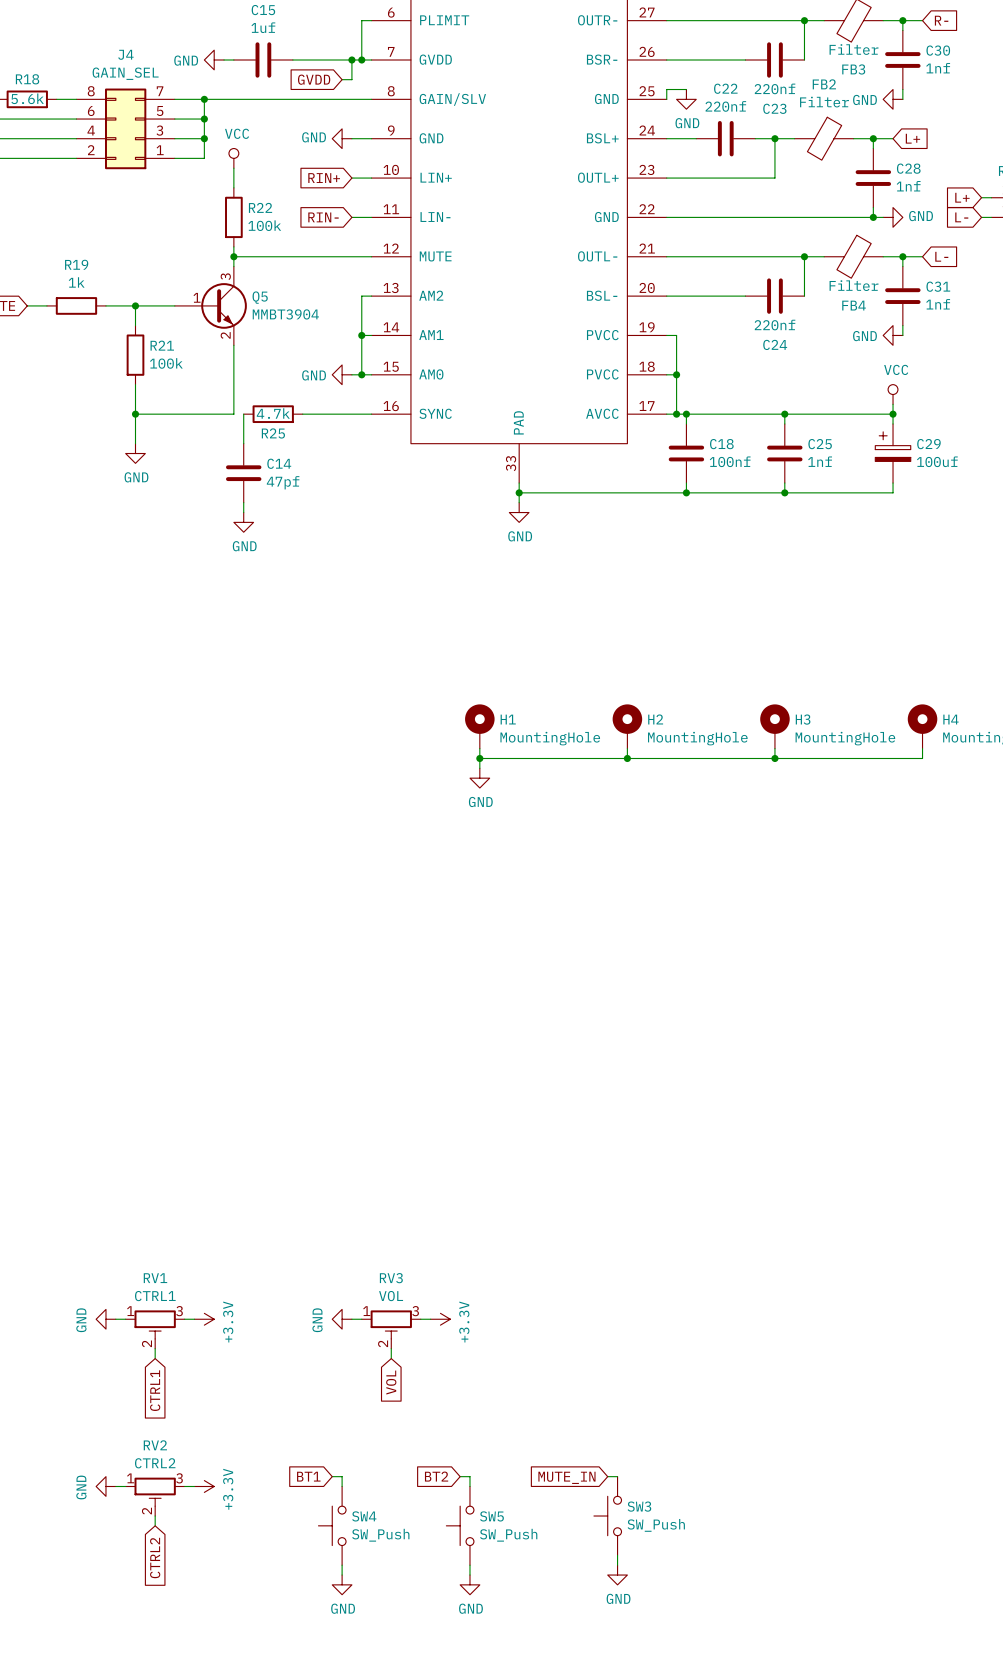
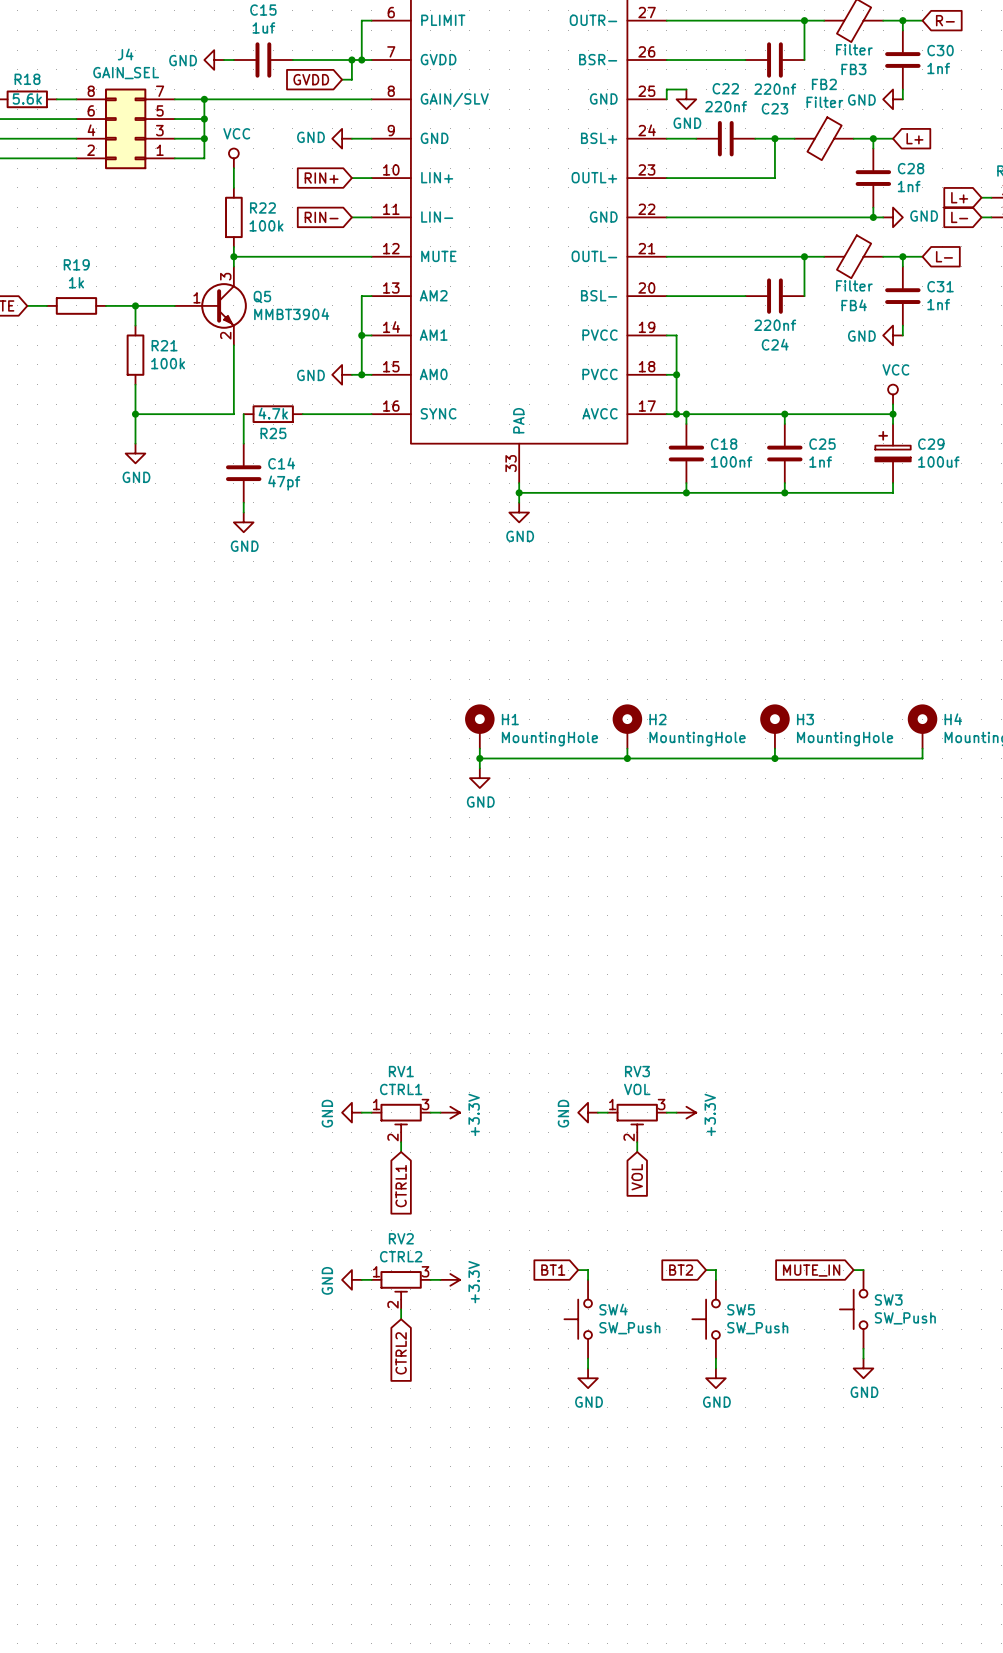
power symbol: none -> GND (351, 1112)
wire: none -> (361, 1112) (371, 1112)
wire: none -> (430, 1112) (440, 1112)
power symbol: none -> +3.3V (450, 1112)
power symbol: none -> GND (588, 1112)
wire: none -> (597, 1112) (607, 1112)
wire: none -> (666, 1112) (676, 1112)
power symbol: none -> +3.3V (686, 1112)
wire: none -> (401, 1142) (401, 1152)
wire: none -> (637, 1142) (637, 1152)
global label: none -> VOL (637, 1177)
global label: none -> CTRL1 (401, 1186)
global label: none -> BT2 (681, 1270)
global label: none -> BT1 (553, 1270)
wire: none -> (578, 1270) (588, 1270) (588, 1279)
wire: none -> (706, 1270) (715, 1270) (715, 1279)
wire: none -> (853, 1270) (863, 1270)
global label: none -> MUTE_IN (811, 1270)
power symbol: GND (105, 1319) -> none
wire: (115, 1319) (125, 1319) -> none
wire: (184, 1319) (194, 1319) -> none
power symbol: +3.3V (204, 1319) -> none
power symbol position: GND (342, 1319) -> GND (351, 1279)
wire: (351, 1319) (361, 1319) -> (361, 1279) (371, 1279)
wire: (420, 1319) (430, 1319) -> (430, 1279) (440, 1279)
power symbol position: +3.3V (440, 1319) -> +3.3V (450, 1279)
RV1 position: (155, 1329) -> (401, 1122)
RV3 position: (391, 1329) -> (637, 1122)
wire: (155, 1348) (155, 1358) -> none
wire: none -> (863, 1348) (863, 1358)
global label: none -> CTRL2 (401, 1353)
wire: none -> (588, 1358) (588, 1368)
wire: none -> (715, 1358) (715, 1368)
power symbol: none -> GND (863, 1368)
power symbol: none -> GND (588, 1378)
power symbol: none -> GND (715, 1378)
global label: VOL (391, 1382) -> none
global label: CTRL1 (155, 1390) -> none
global label: BT1 (308, 1476) -> none
wire: (332, 1476) (342, 1476) (342, 1486) -> none
global label: BT2 (436, 1476) -> none
wire: (460, 1476) (469, 1476) (469, 1486) -> none
wire: (607, 1476) (617, 1476) -> none
global label: MUTE_IN (566, 1477) -> none
power symbol: GND (105, 1486) -> none
wire: (115, 1486) (125, 1486) -> none
wire: (184, 1486) (194, 1486) -> none
power symbol: +3.3V (204, 1486) -> none
RV2 position: (155, 1496) -> (401, 1290)
wire: (155, 1516) (155, 1525) -> none
SW3 position: (607, 1516) -> (853, 1309)
SW4 position: (332, 1525) -> (578, 1319)
SW5 position: (460, 1525) -> (706, 1319)
wire: (617, 1555) (617, 1565) -> none
global label: CTRL2 (155, 1558) -> none
wire: (342, 1565) (342, 1575) -> none
wire: (469, 1565) (469, 1575) -> none
power symbol: GND (617, 1575) -> none
power symbol: GND (342, 1584) -> none
power symbol: GND (469, 1584) -> none

